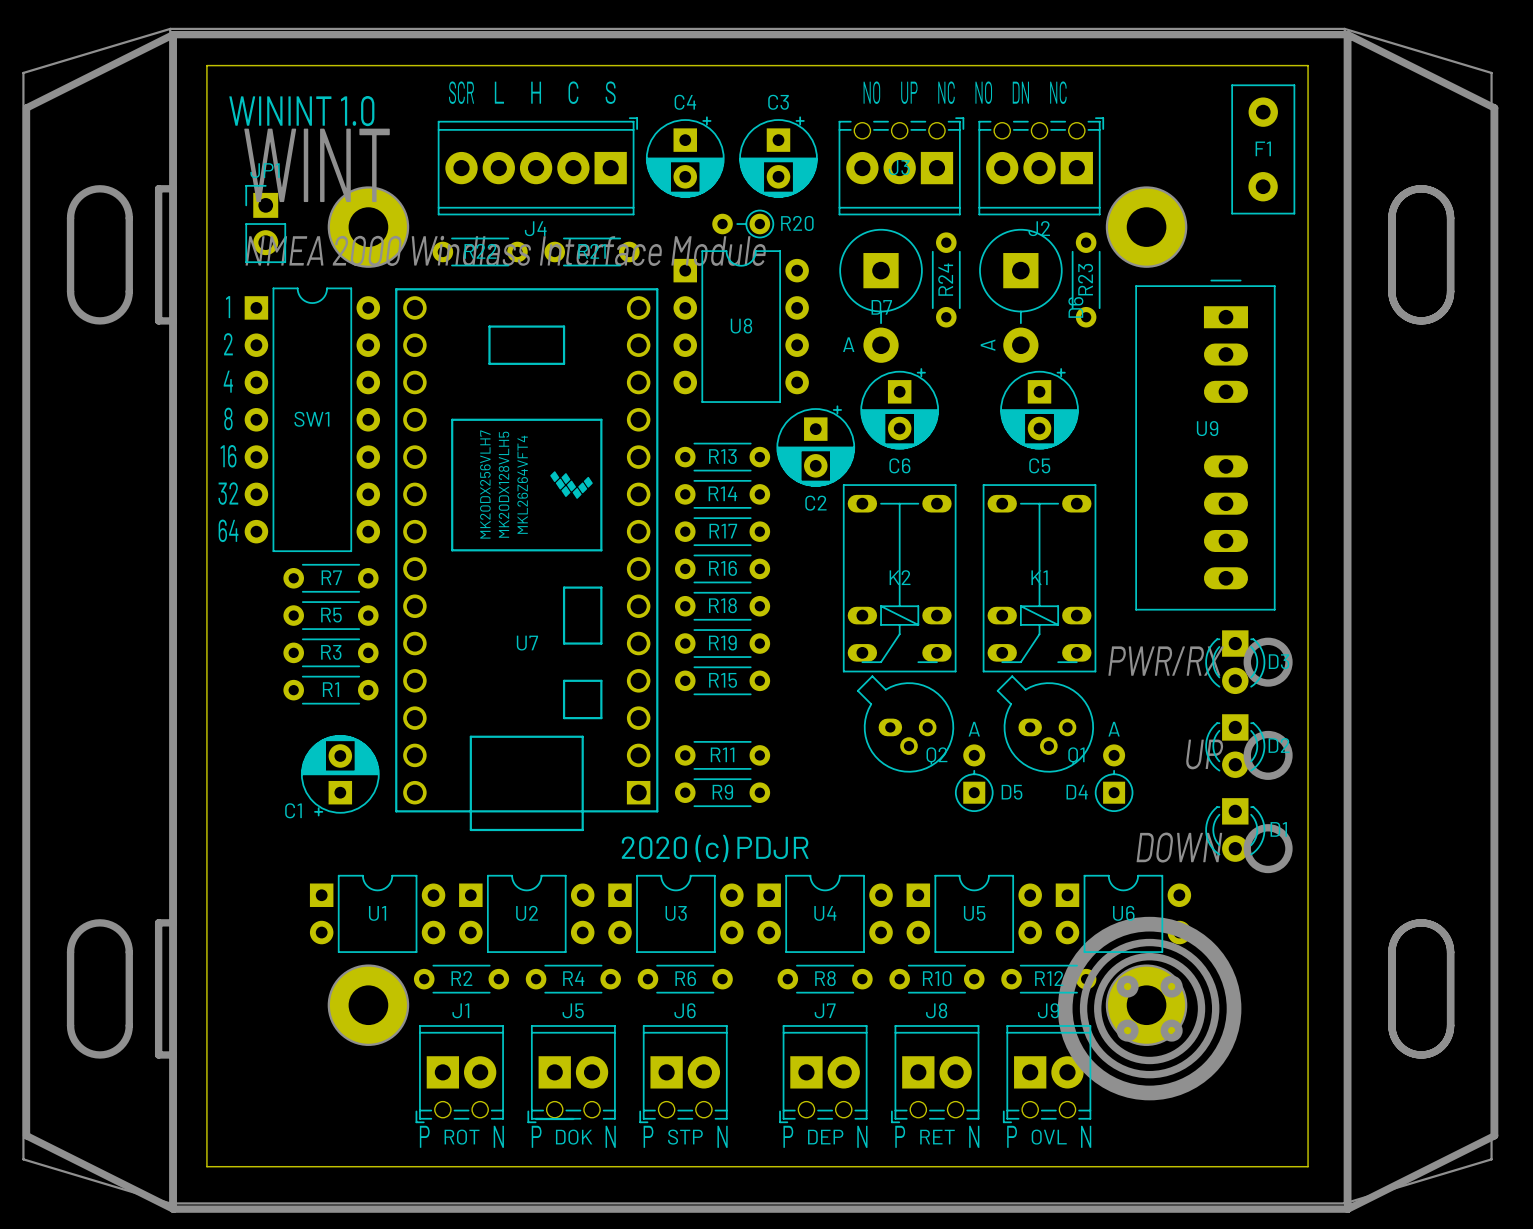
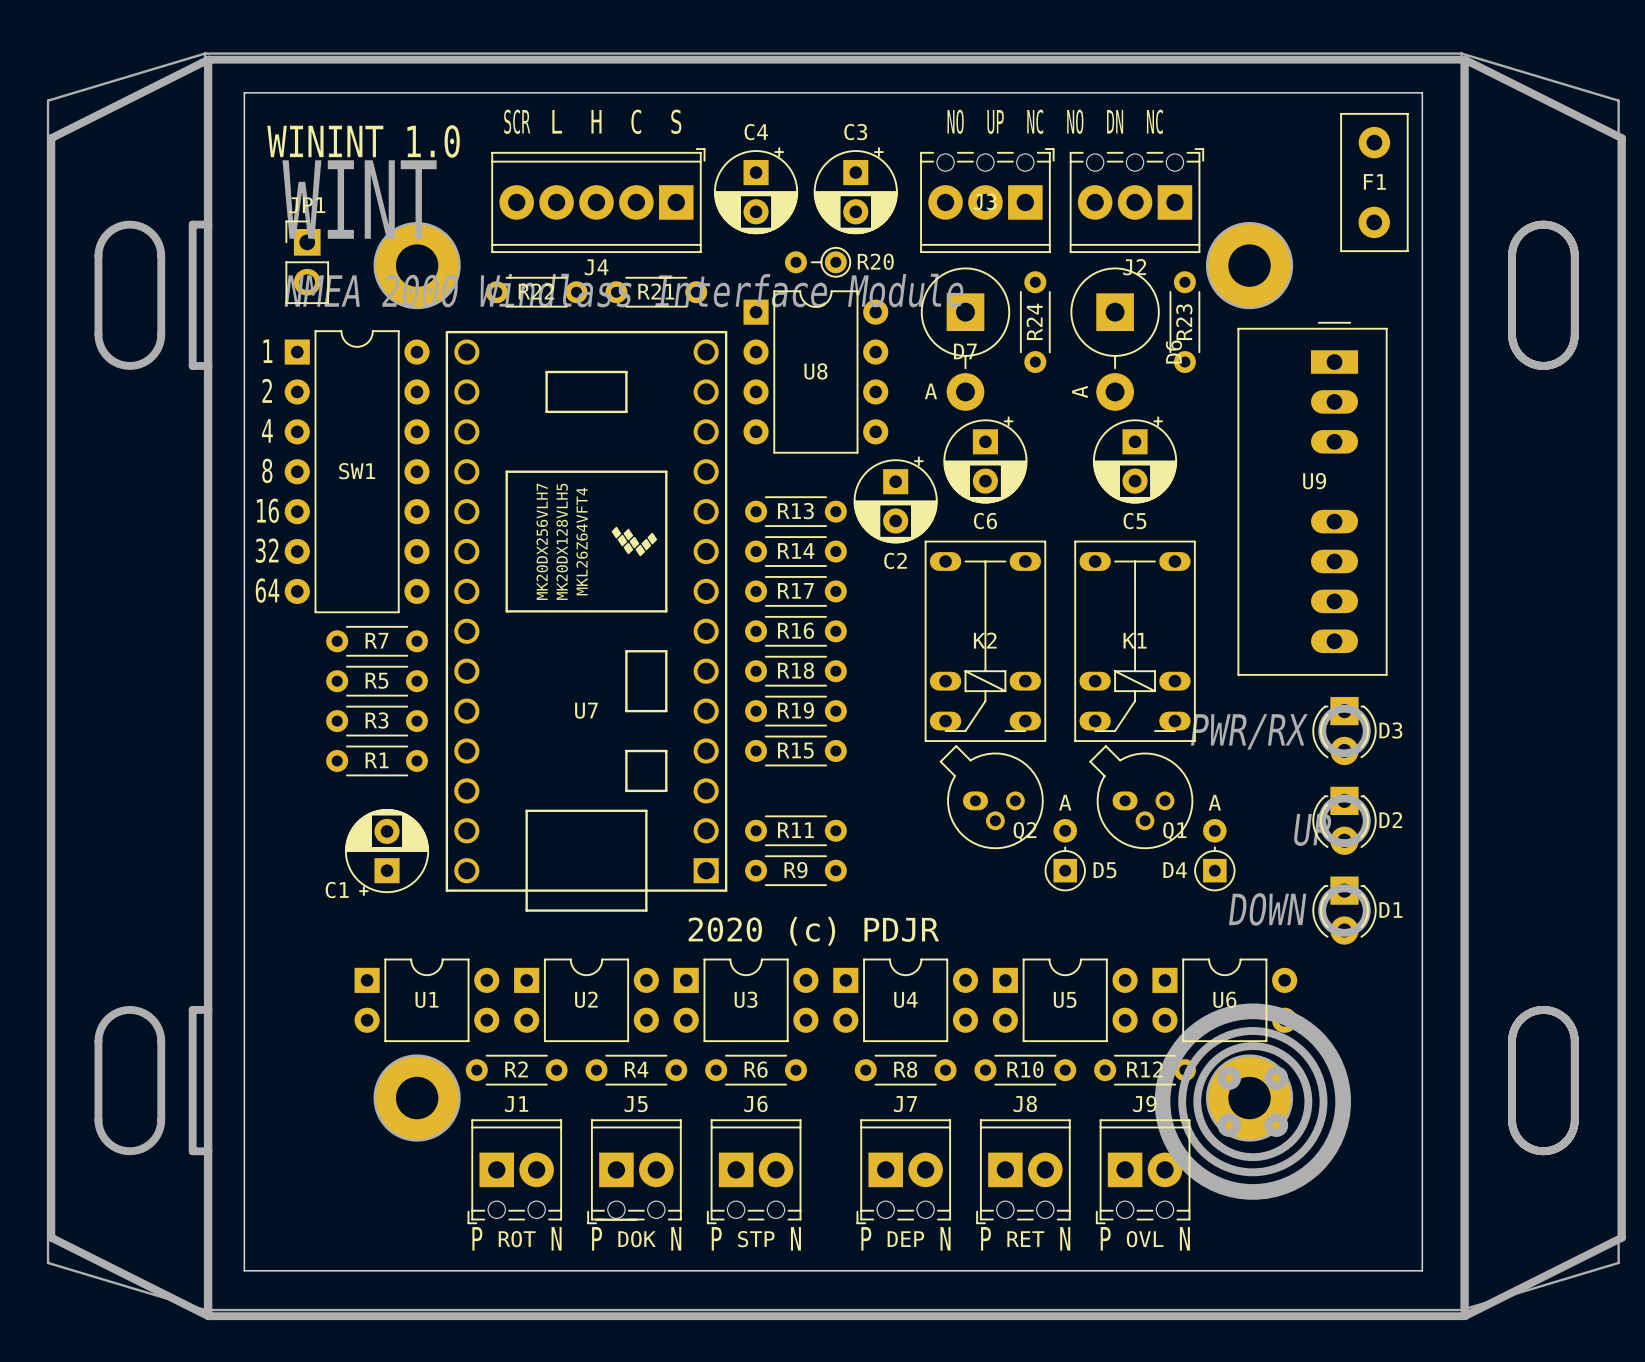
text position: PWR/RX (1166, 661) -> PWR/RX (1249, 731)
drawing position: (1268, 662) -> (1344, 731)
drawing position: (1268, 755) -> (1344, 820)
text position: DOWN (1179, 847) -> DOWN (1267, 909)
drawing position: (1268, 848) -> (1344, 910)

